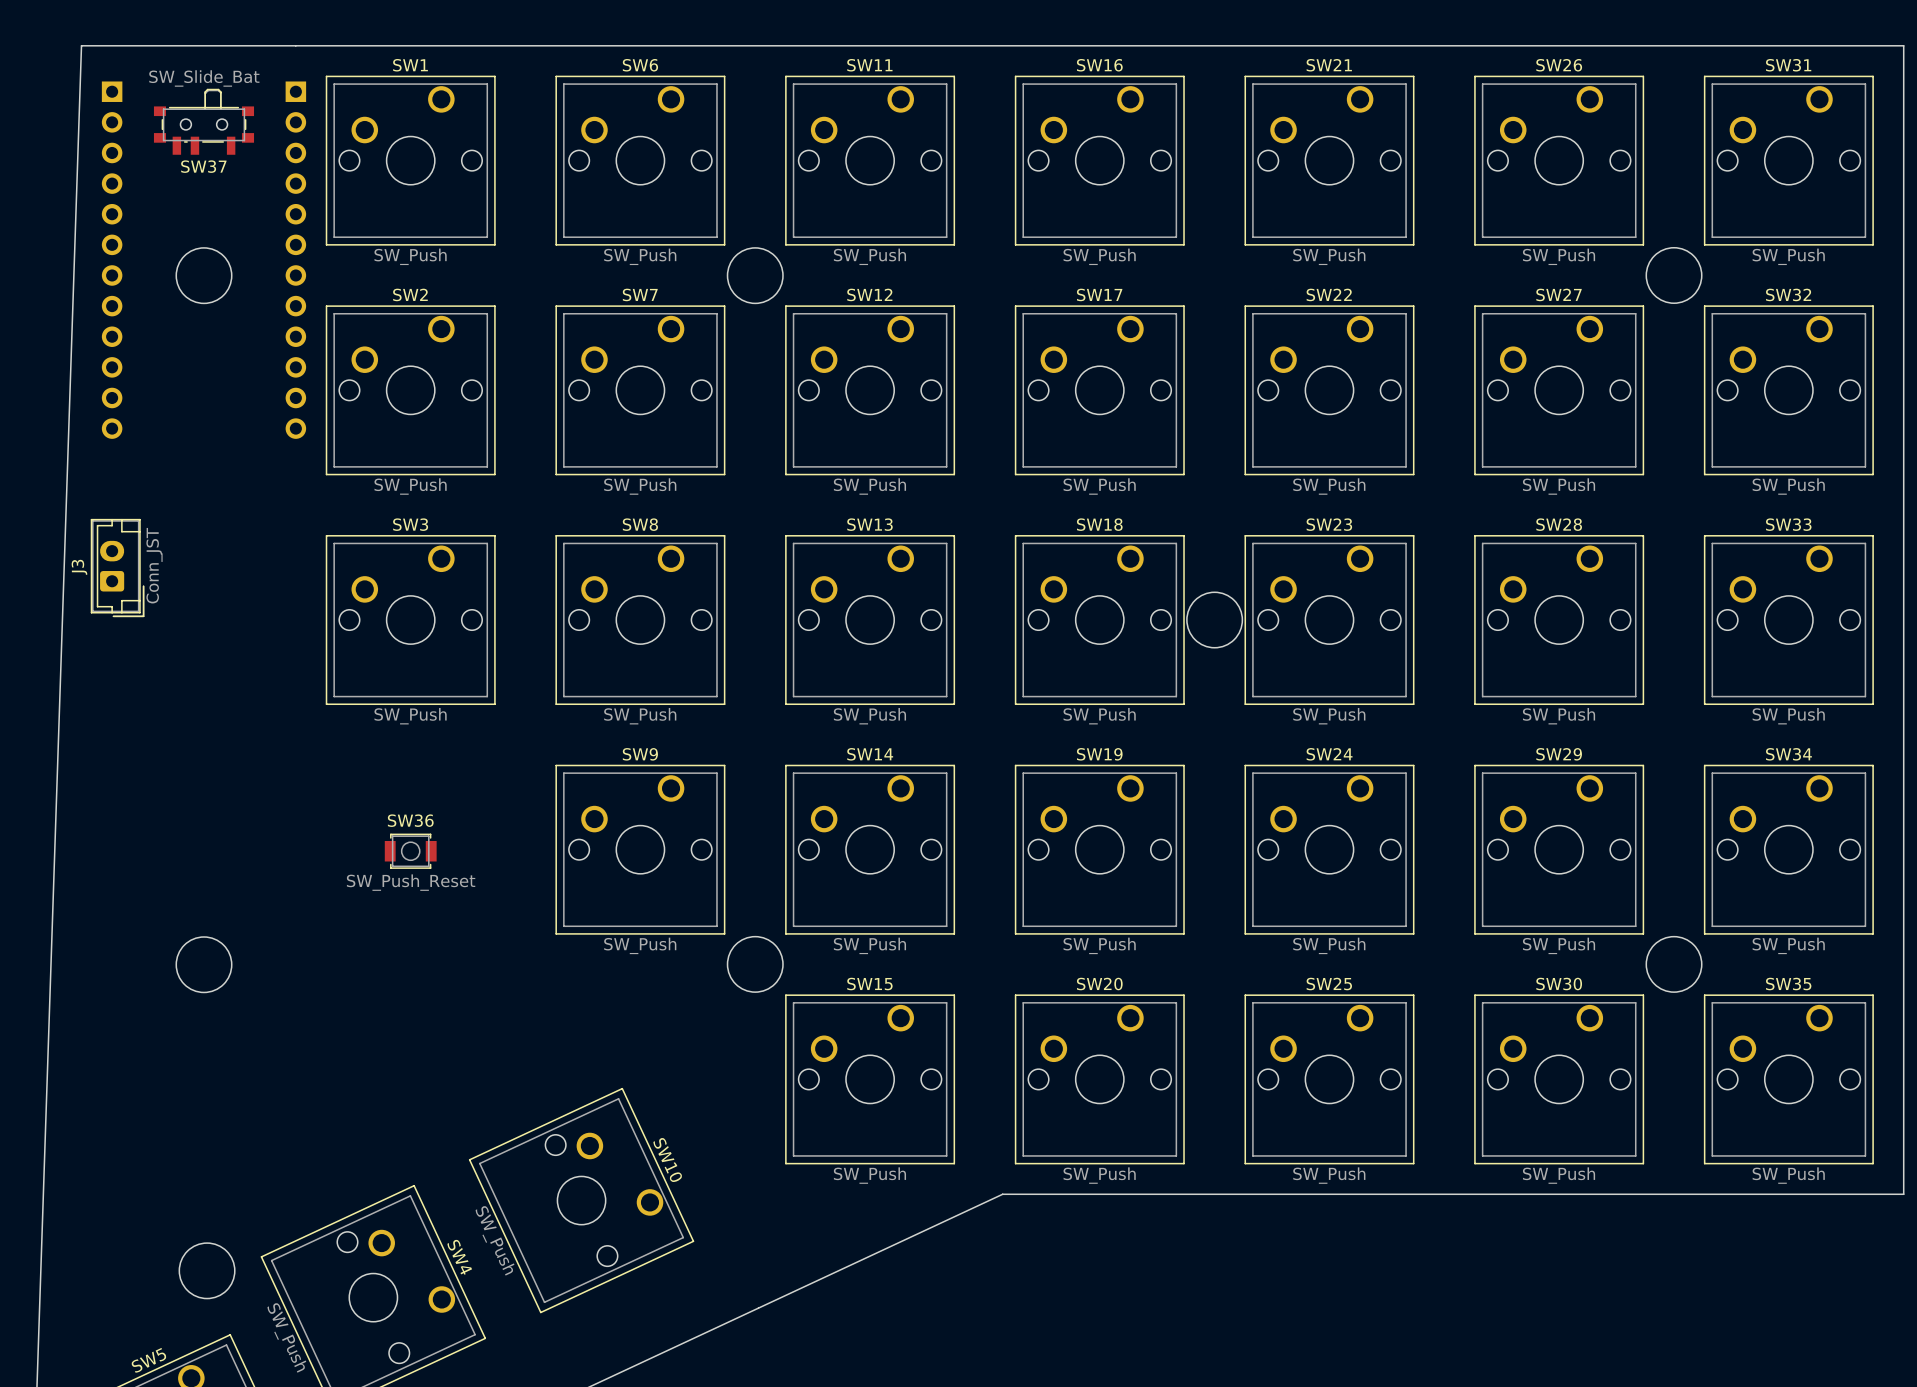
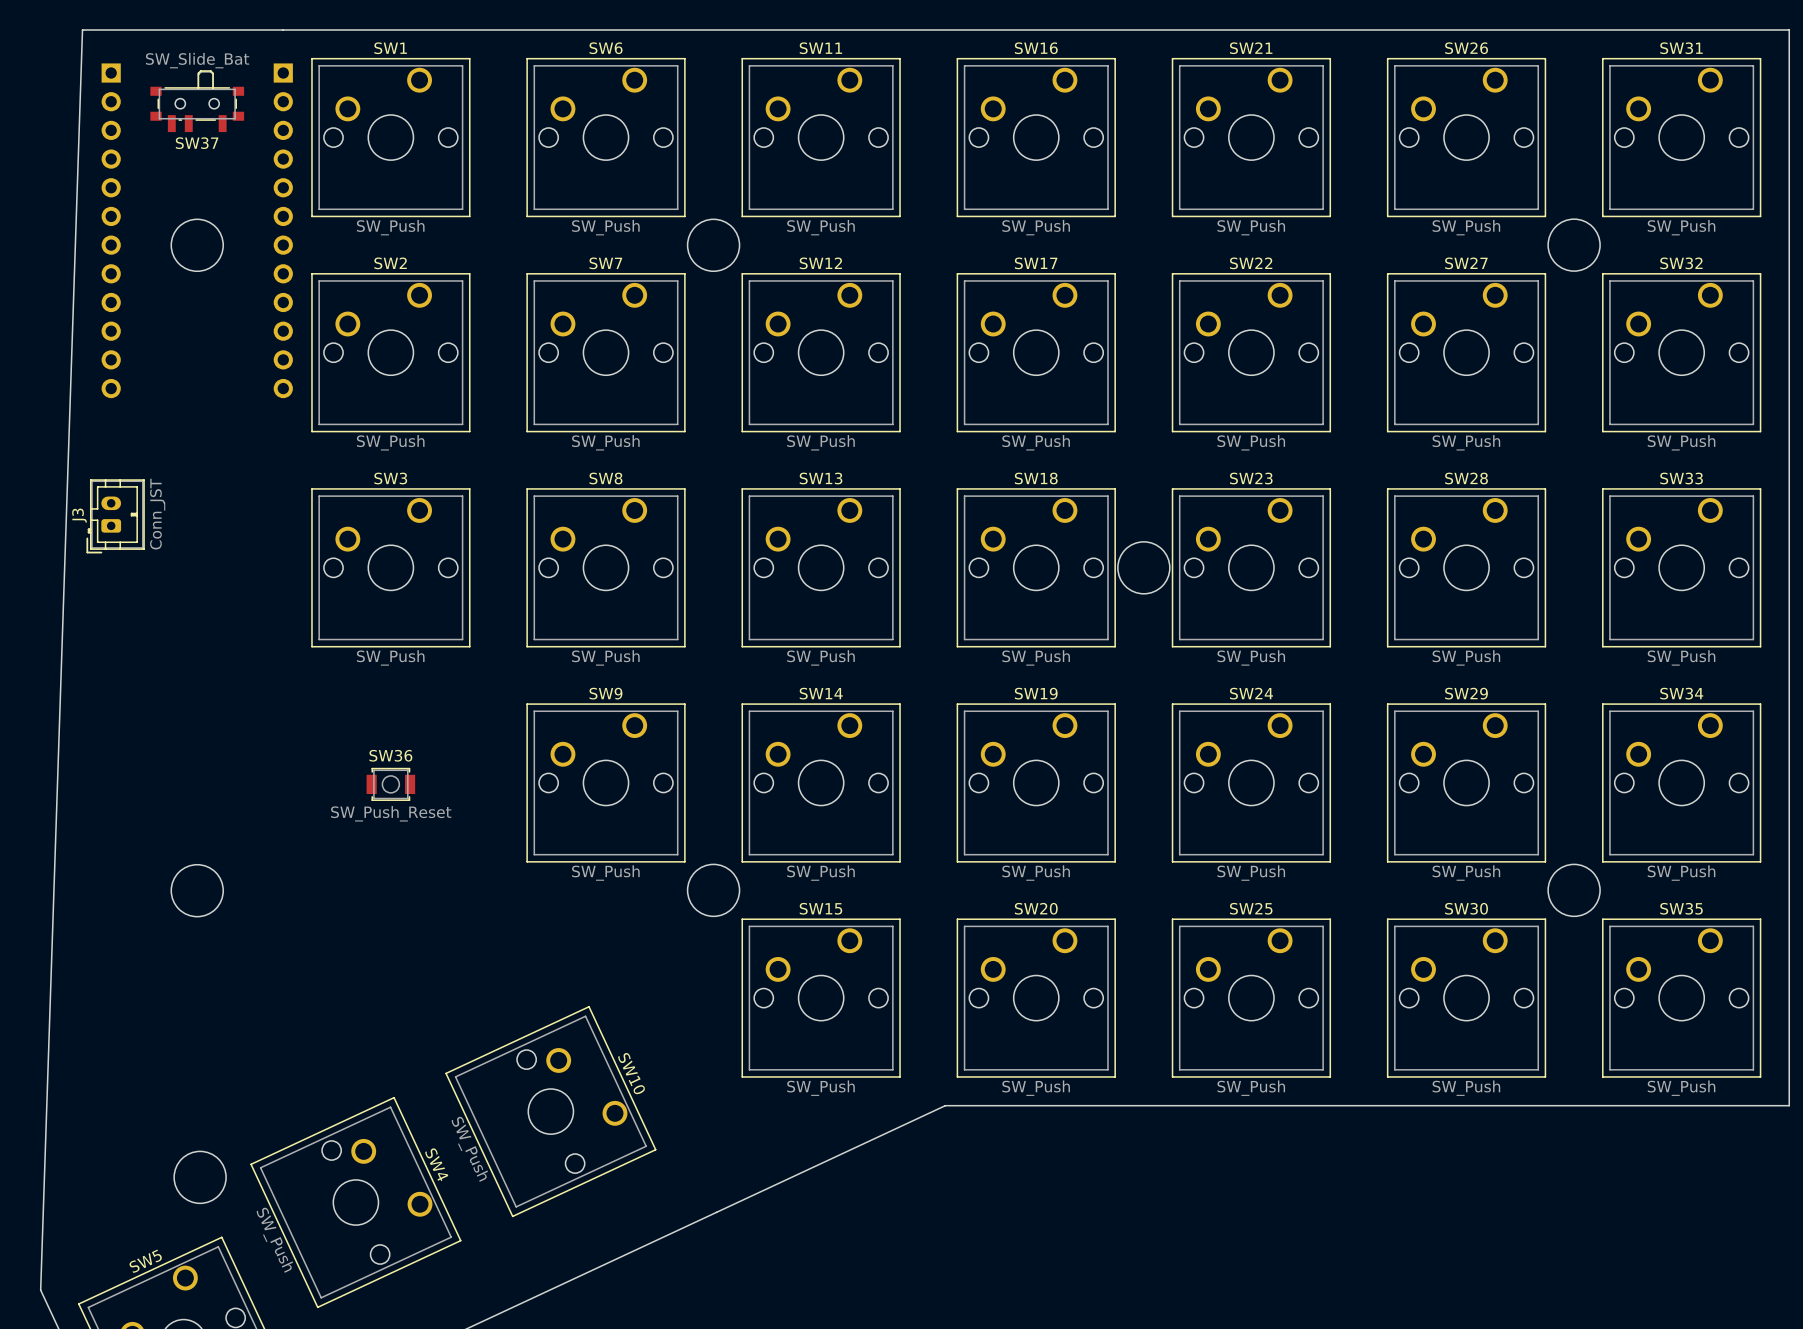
J3 footprint: [90, 518, 145, 618] -> [86, 479, 145, 554]

